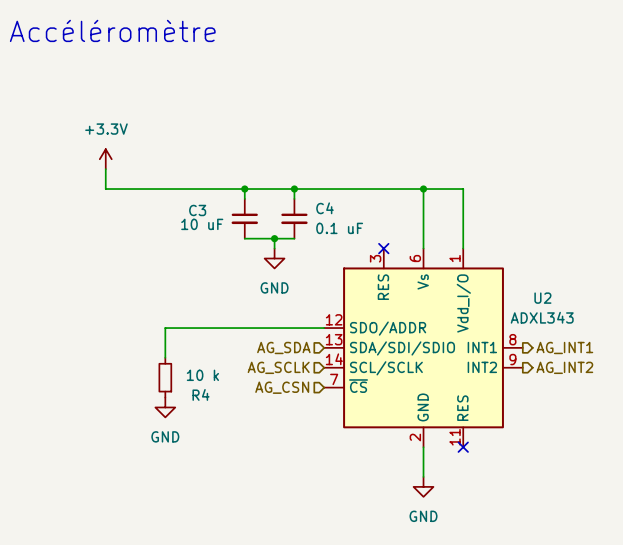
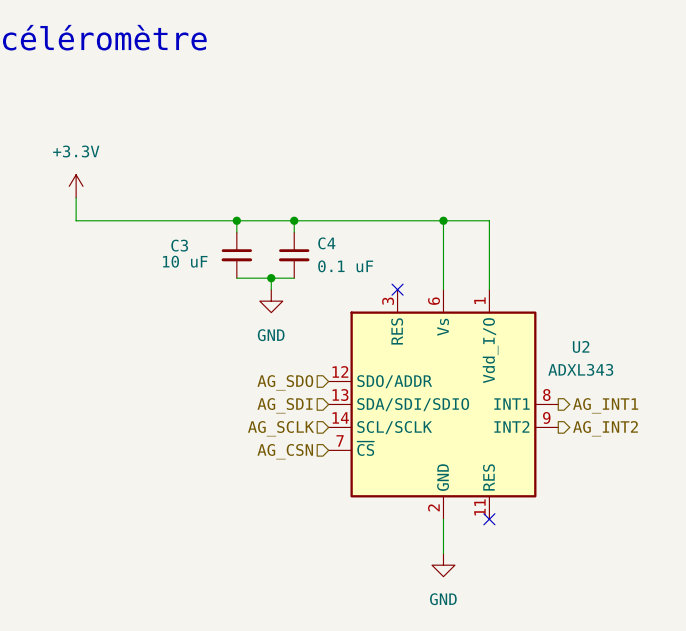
hierarchical label: none -> AG_SDO (285, 382)
wire: (324, 328) (165, 328) (165, 357) -> none
hierarchical label: AG_SDA (283, 347) -> AG_SDI (285, 405)
R4: 10 k (165, 377) -> none
power symbol: GND (165, 407) -> none

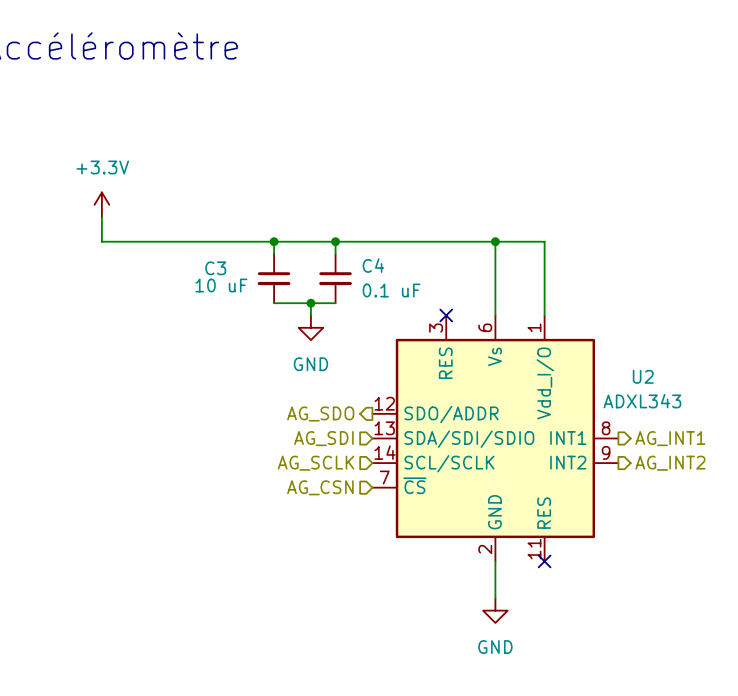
hierarchical label shape: input (285, 382) -> output (320, 414)

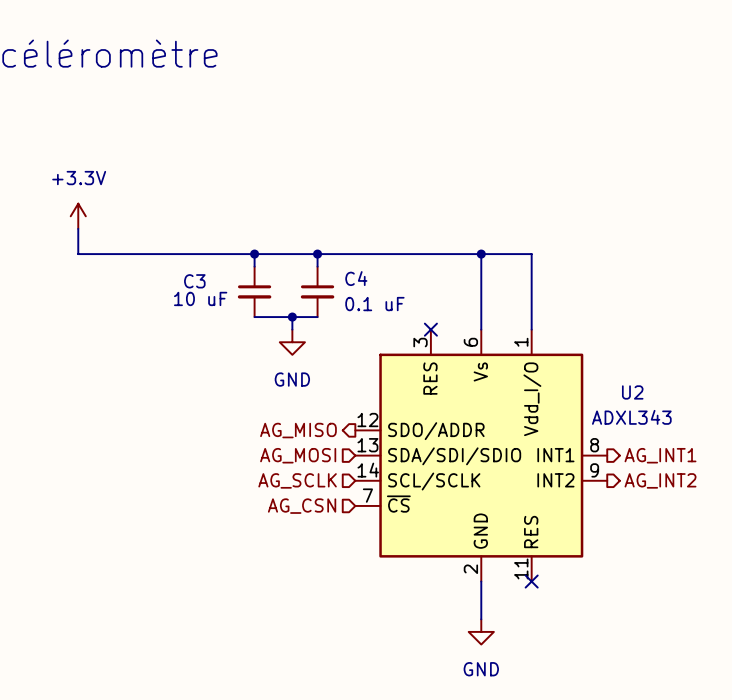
hierarchical label: AG_SDO (320, 414) -> AG_MISO (298, 430)
hierarchical label: AG_SDI (323, 438) -> AG_MOSI (298, 455)

